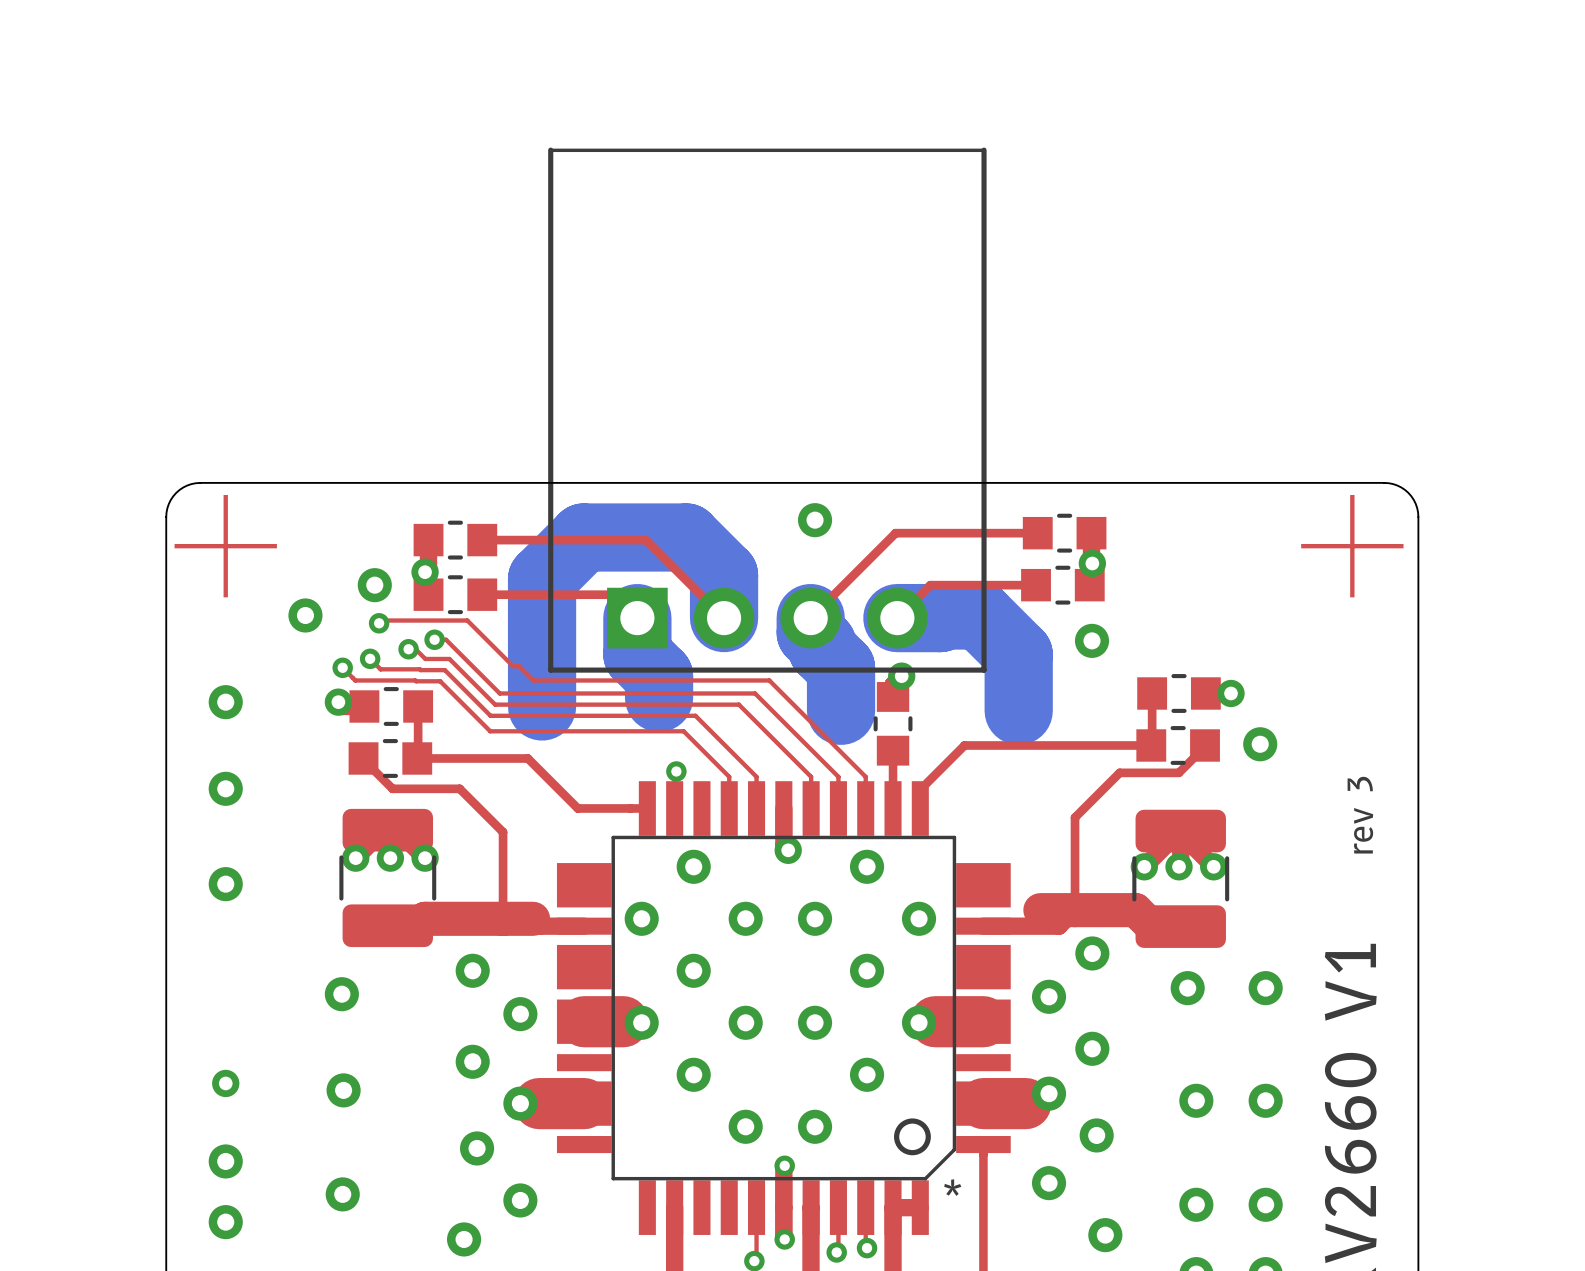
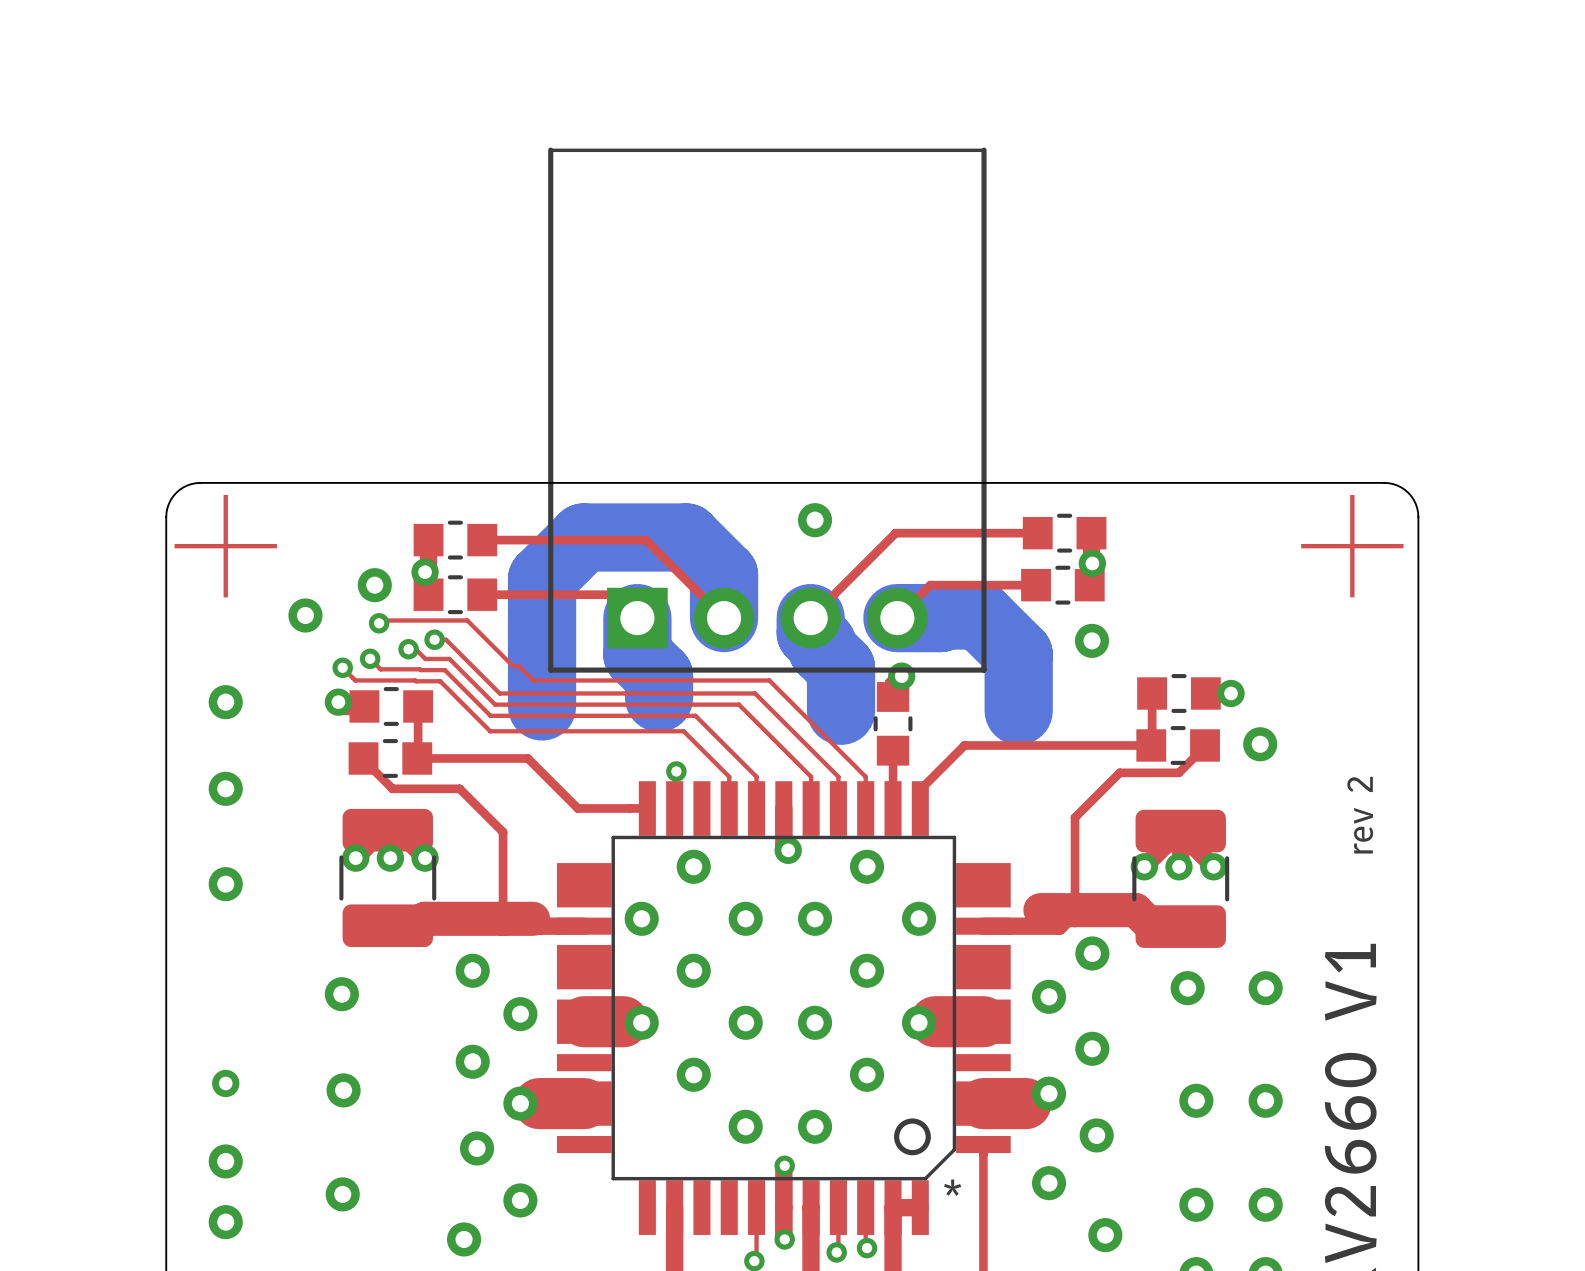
text: rev 3 (1360, 815) -> rev 2 (1360, 815)

